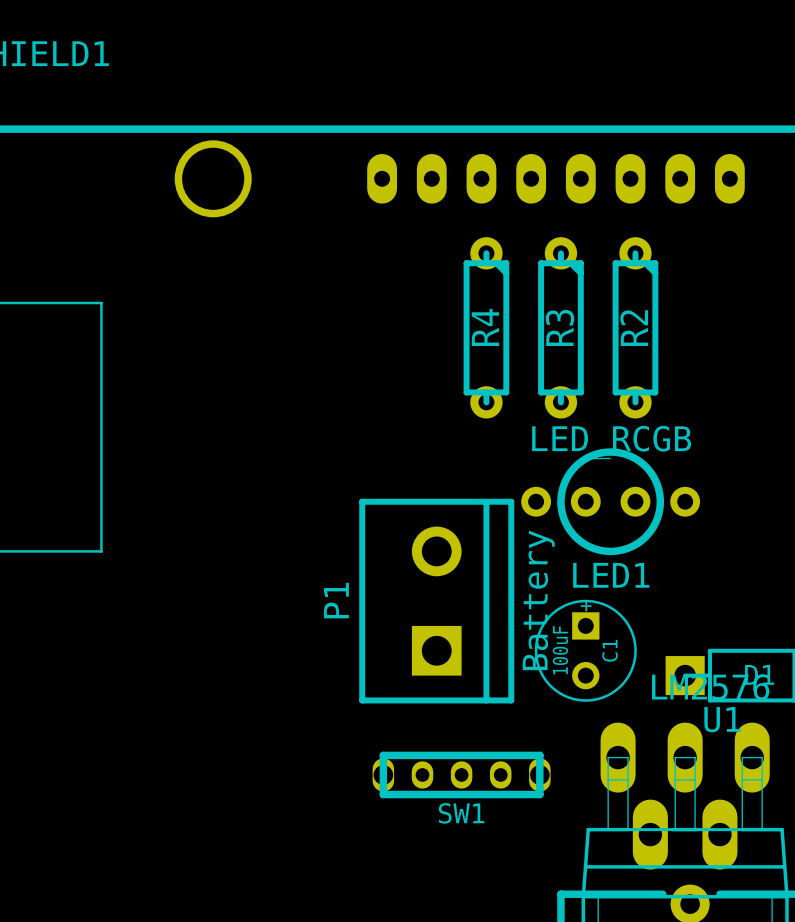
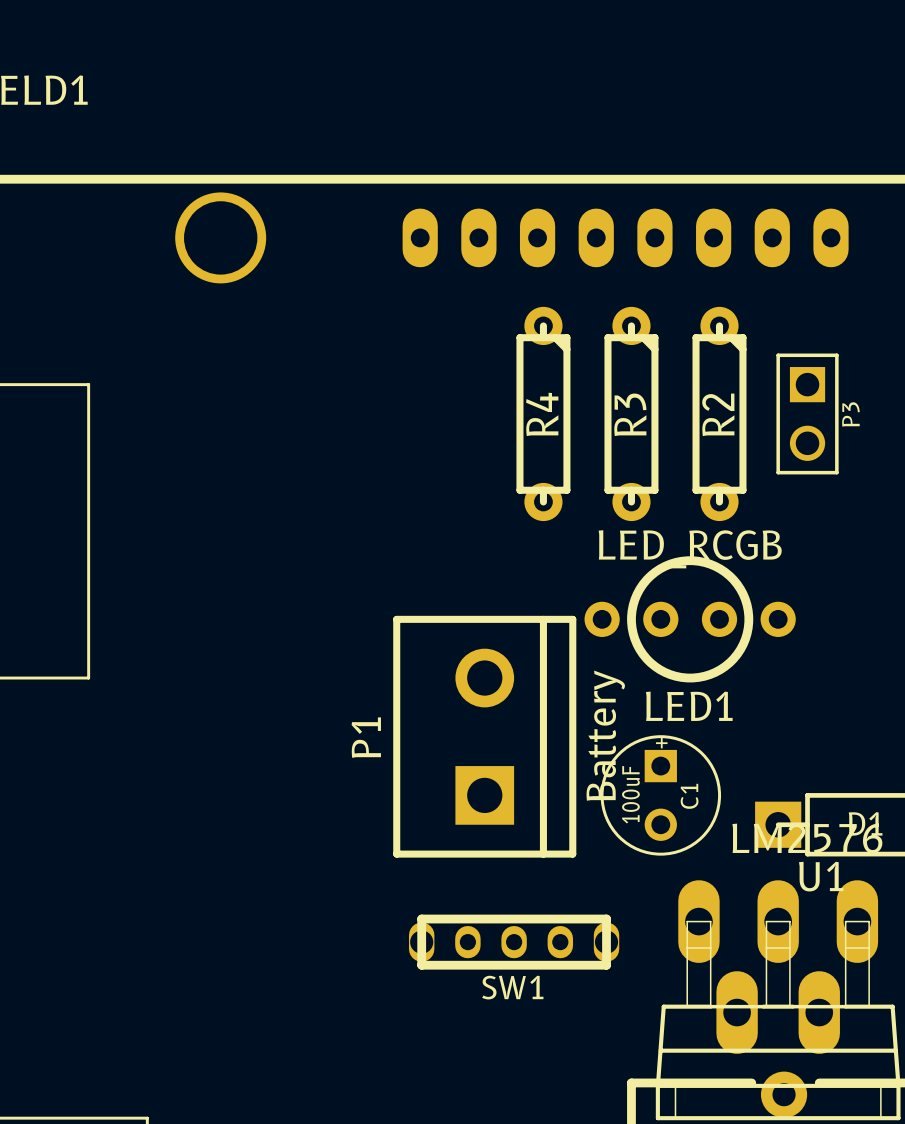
P3: none -> (807, 413)

